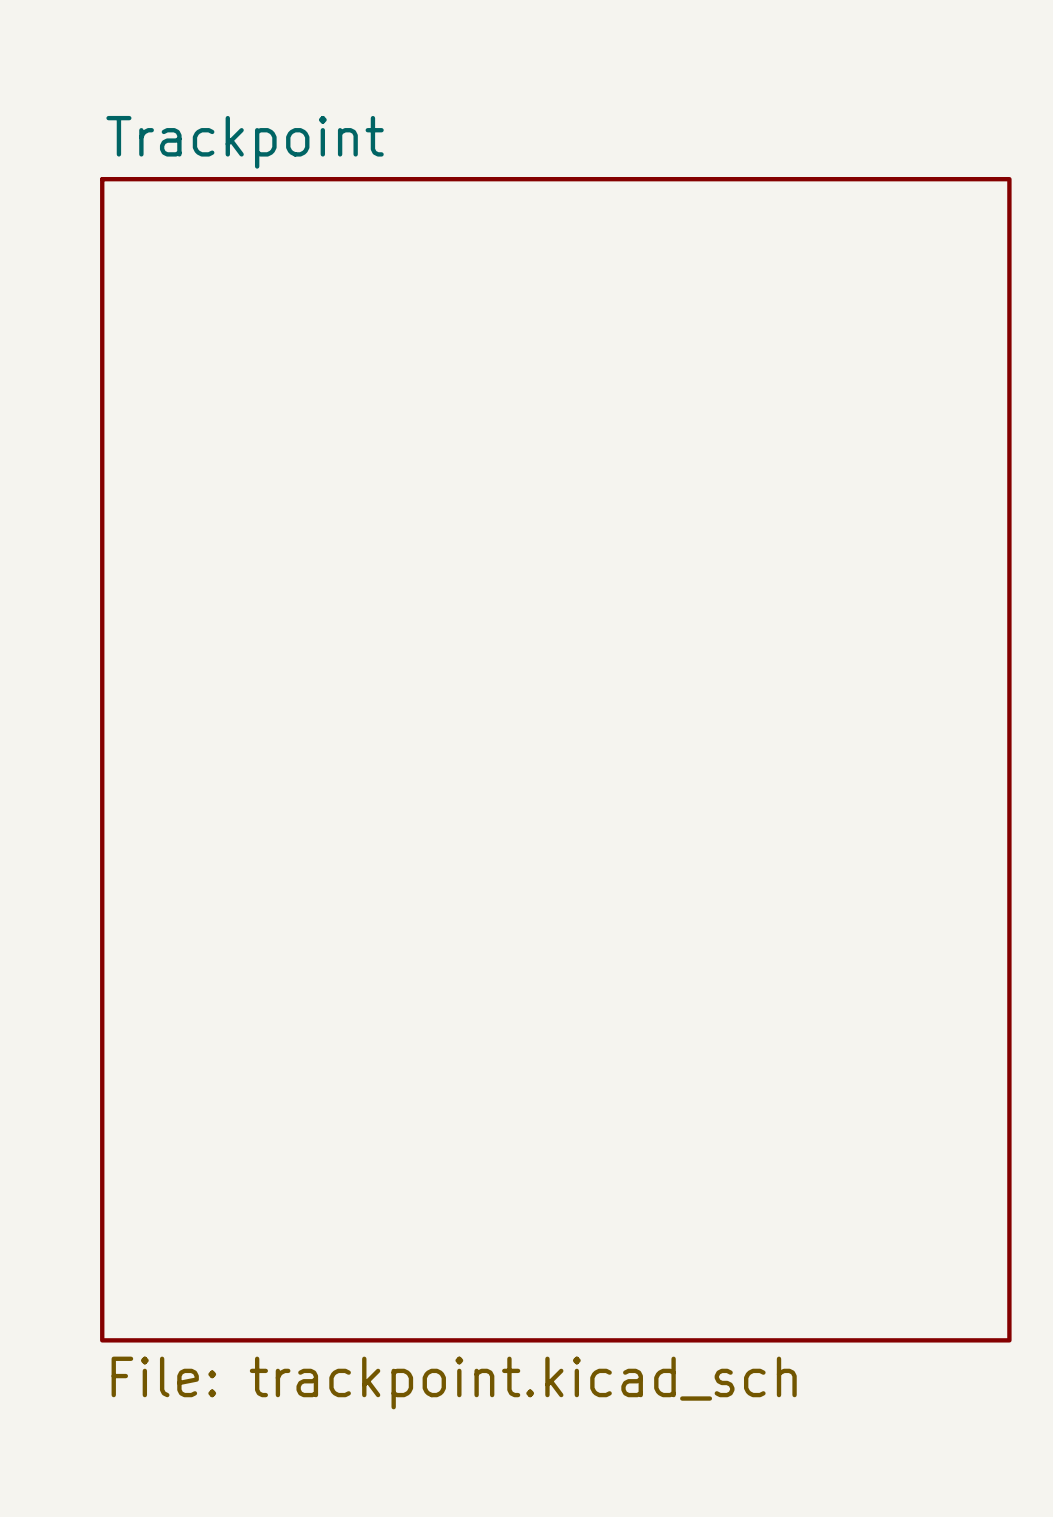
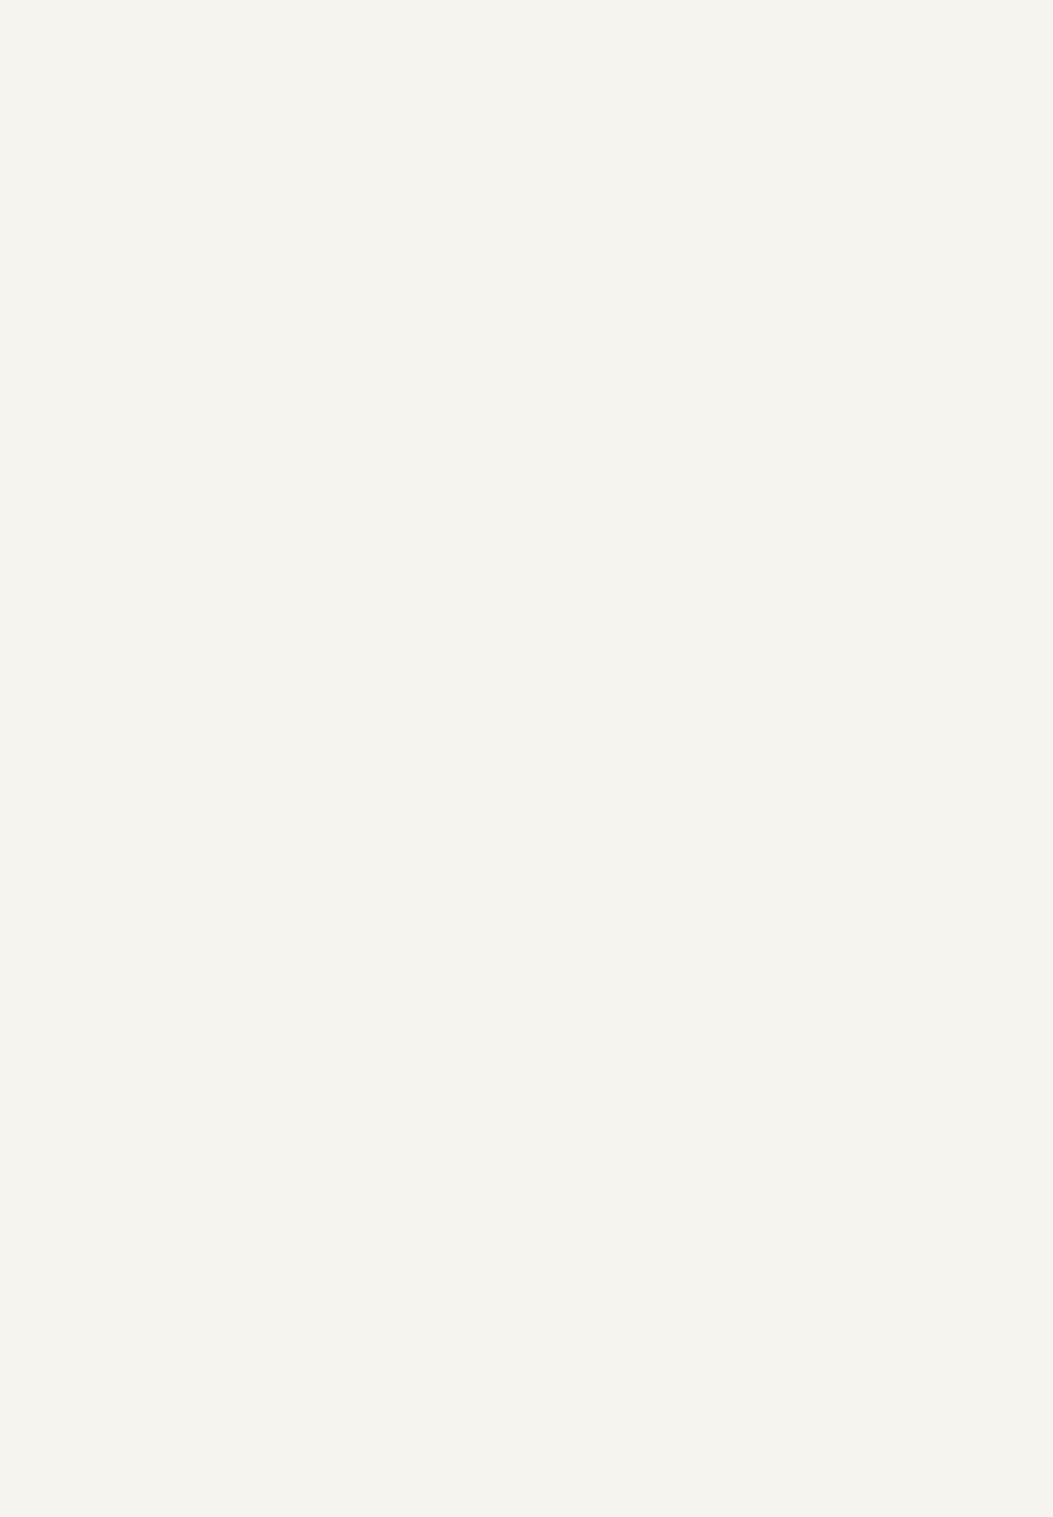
sheet Trackpoint: File: trackpoint.kicad_sch (555, 759) -> none

